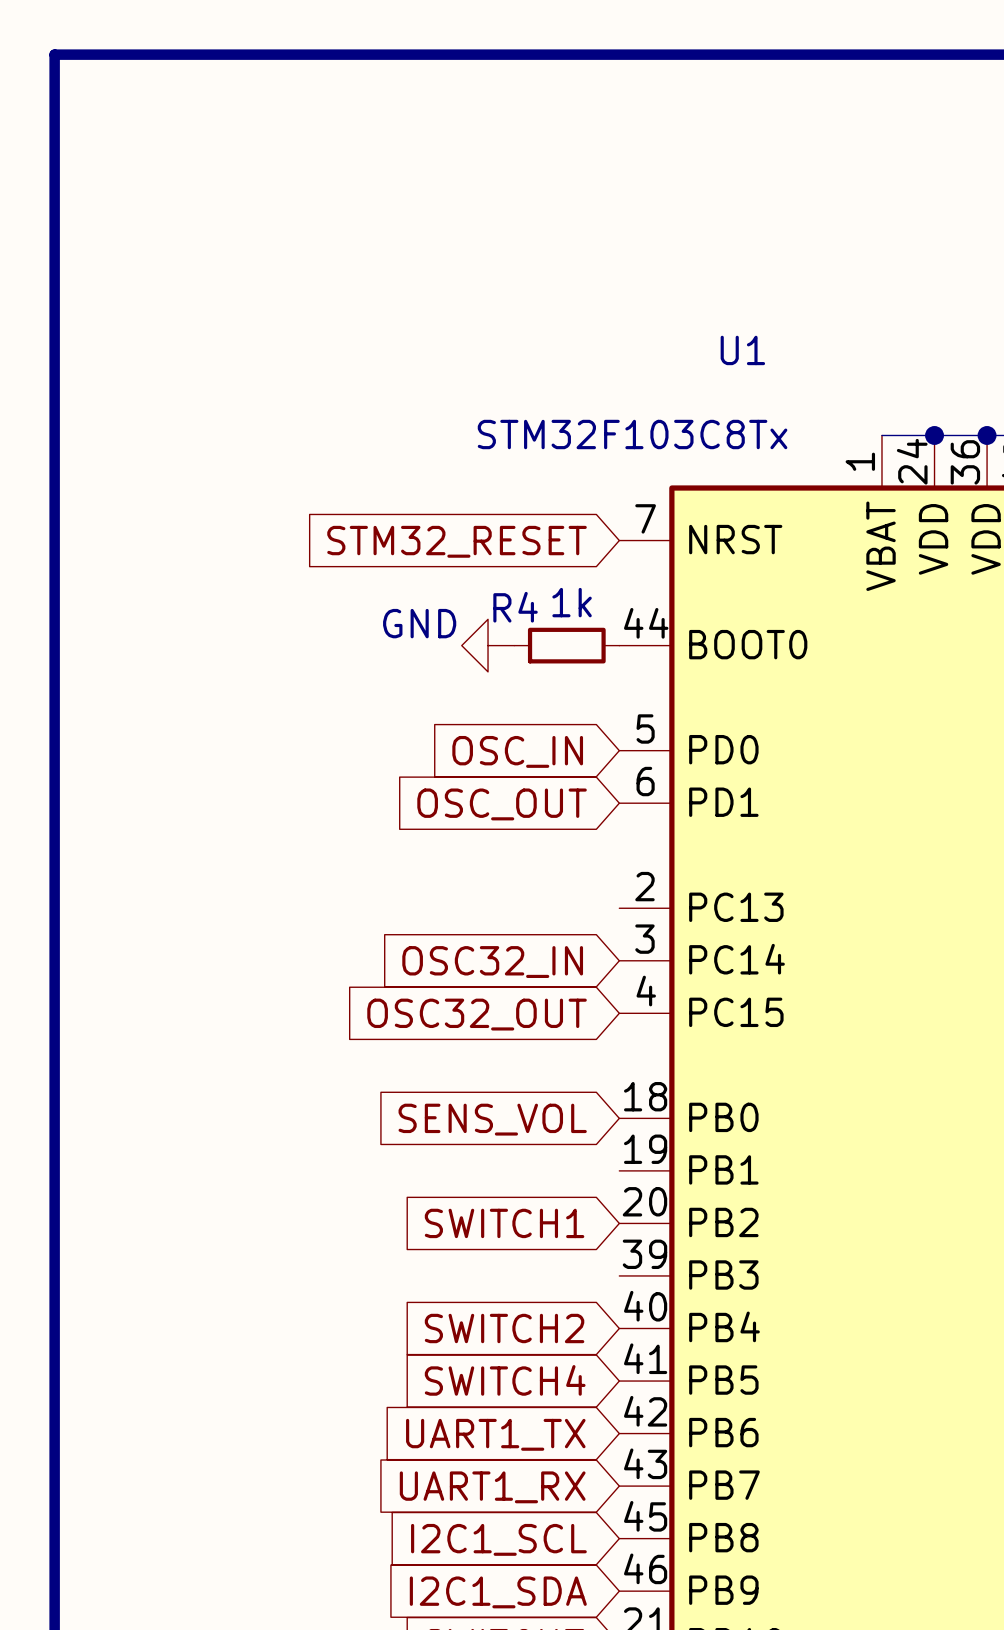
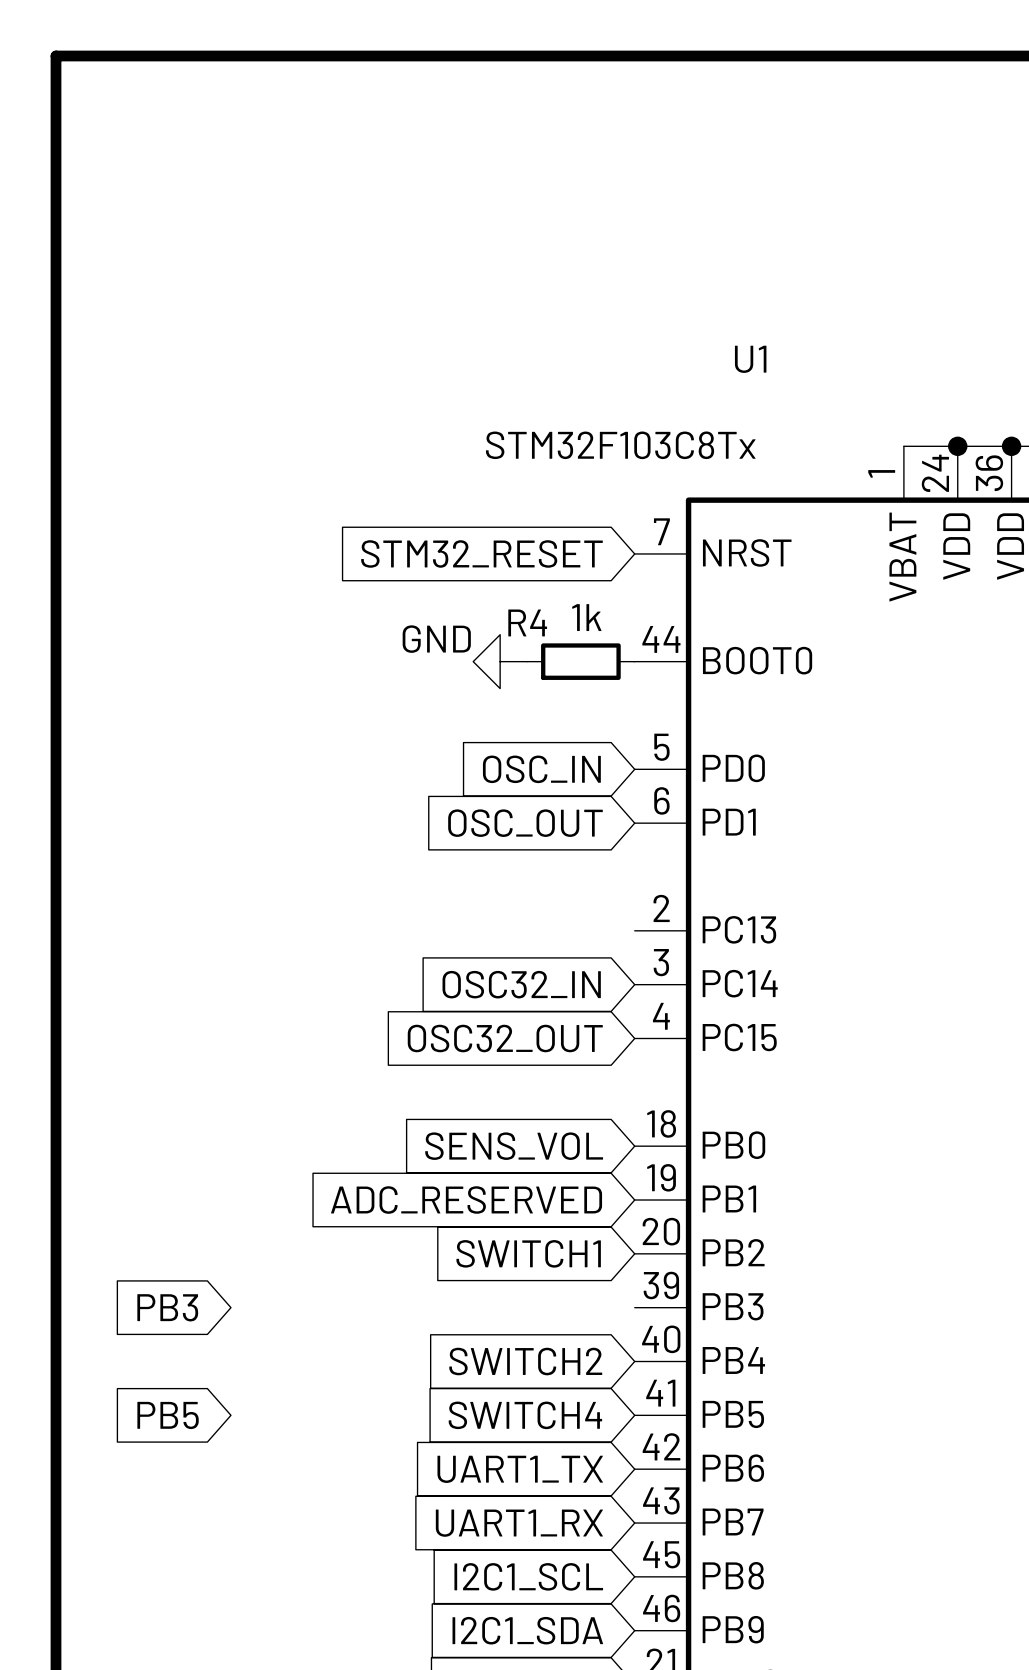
global label: none -> ADC_RESERVED (466, 1200)
global label: none -> PB3 (167, 1307)
global label: none -> PB5 (168, 1415)

